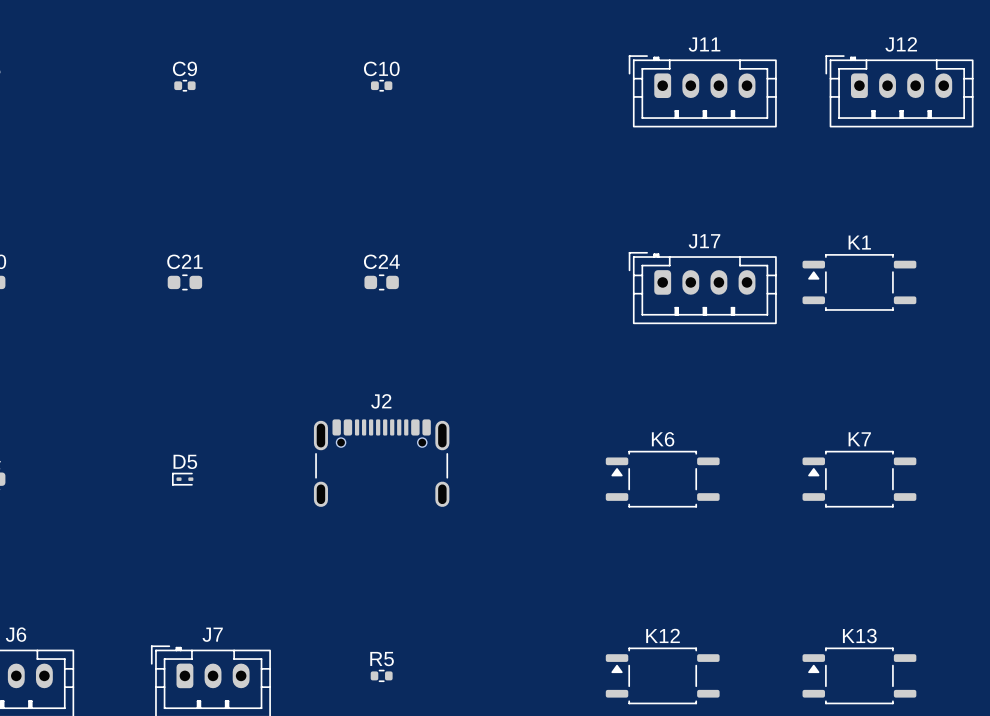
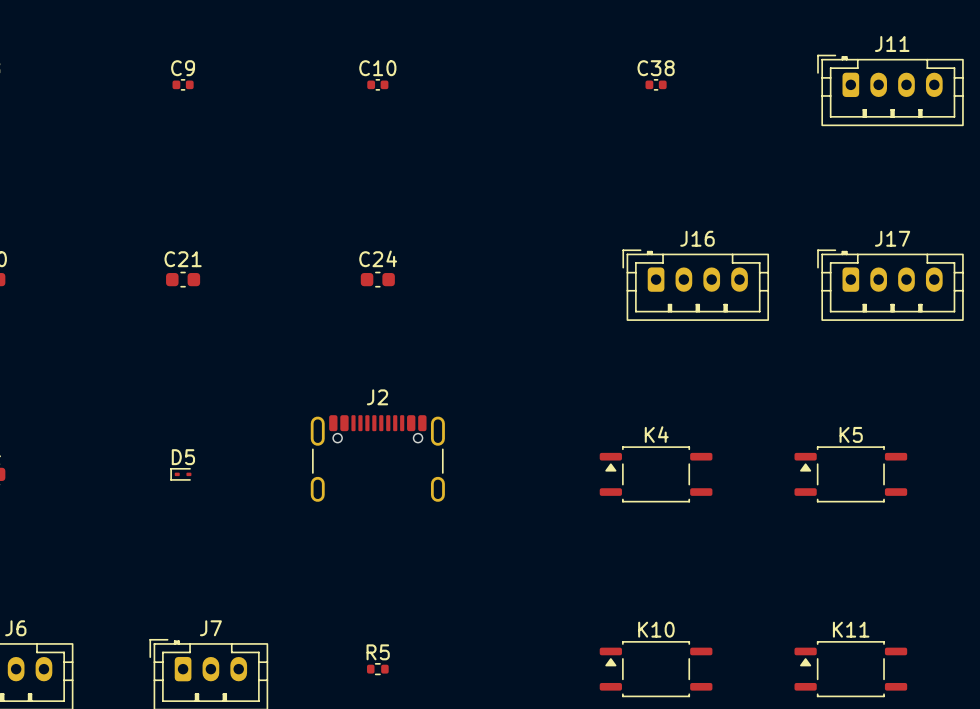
J12 name: J12 (901, 44) -> J11 (892, 43)
C38: none -> (656, 84)
J11: (702, 91) -> none
J17 name: J17 (704, 241) -> J16 (697, 238)
K1: (859, 282) -> none
J17: none -> (890, 285)
K6 name: K6 (663, 439) -> K4 (656, 434)
K7 name: K7 (859, 439) -> K5 (851, 434)
K12 name: K12 (663, 635) -> K10 (656, 629)
K13 name: K13 (859, 636) -> K11 (851, 629)

